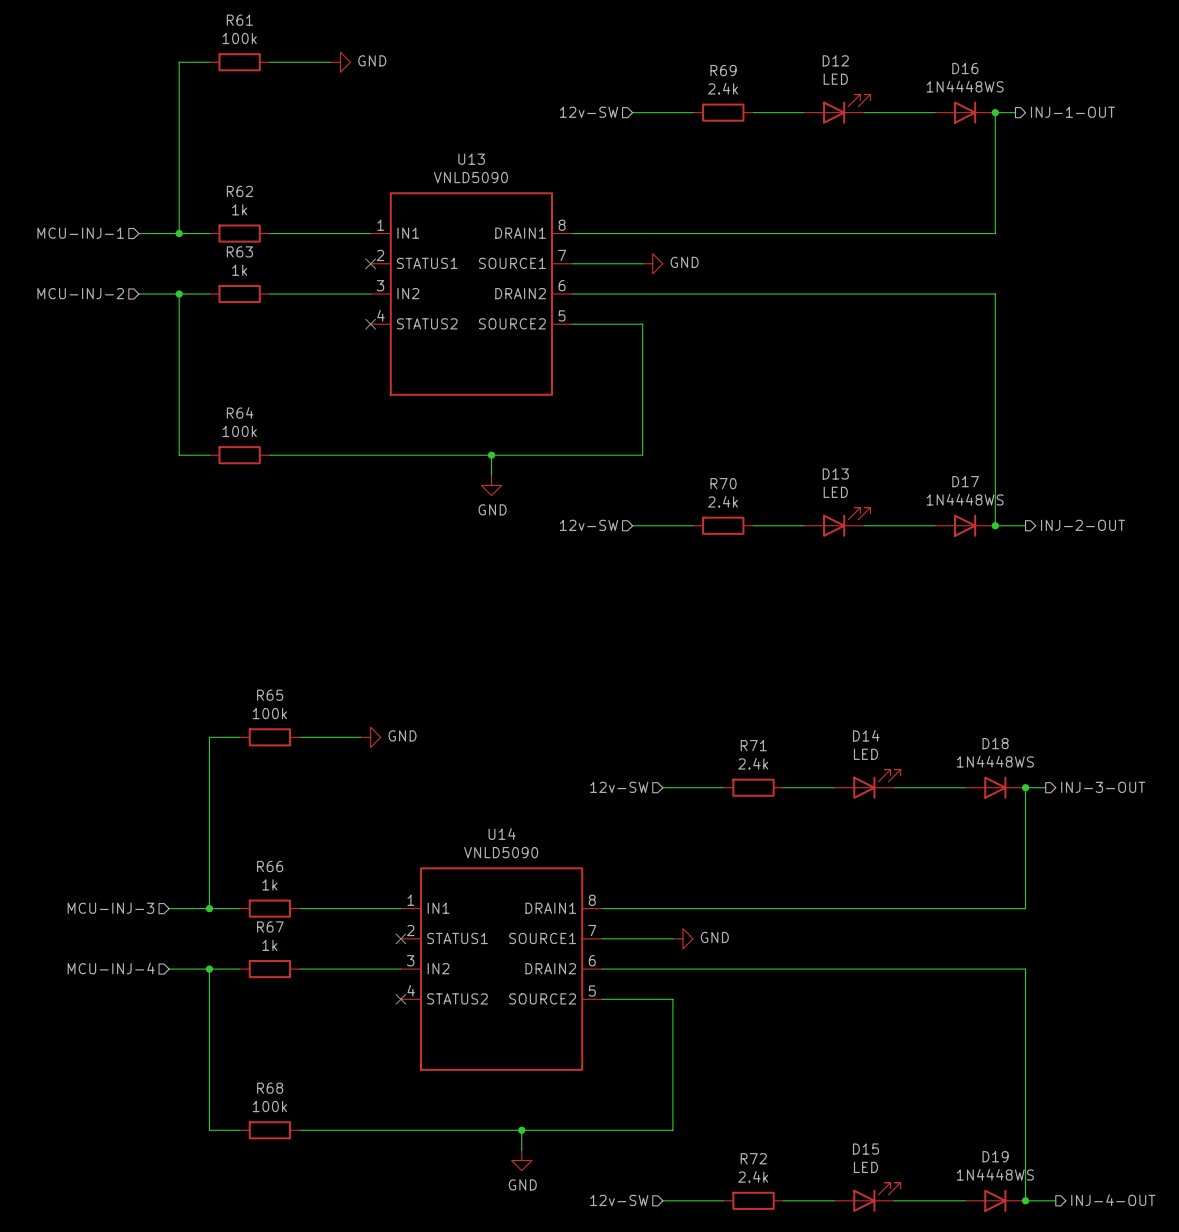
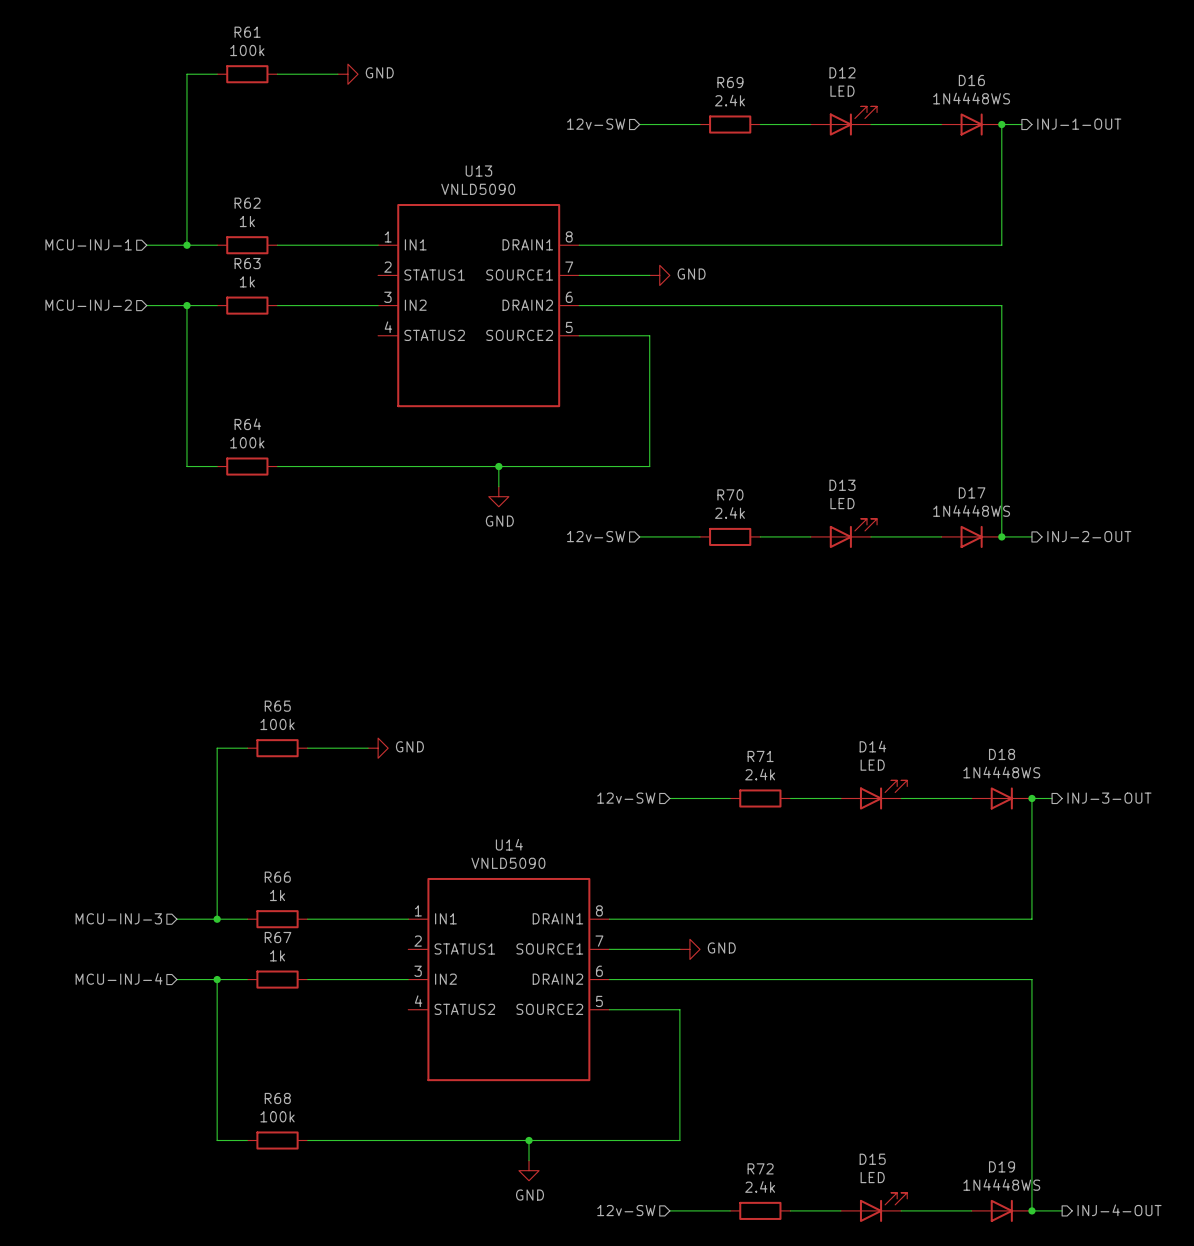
no-connect mark: (370, 263) -> none
no-connect mark: (370, 324) -> none
no-connect mark: (400, 938) -> none
no-connect mark: (400, 999) -> none

